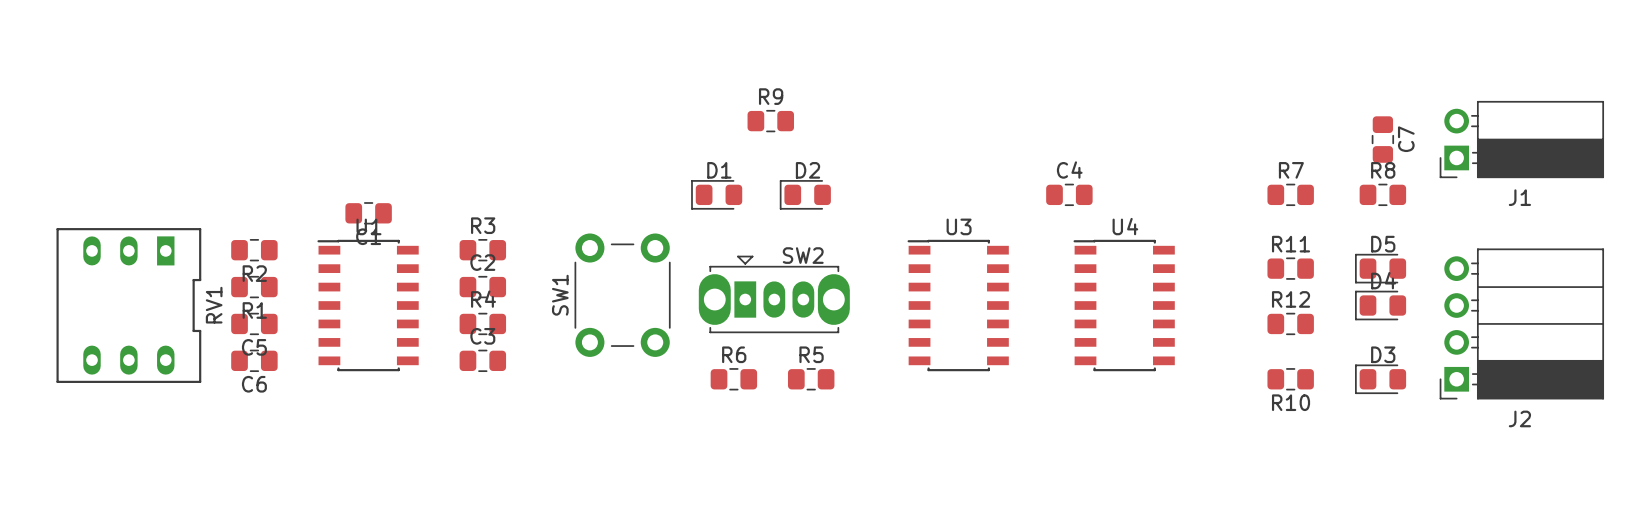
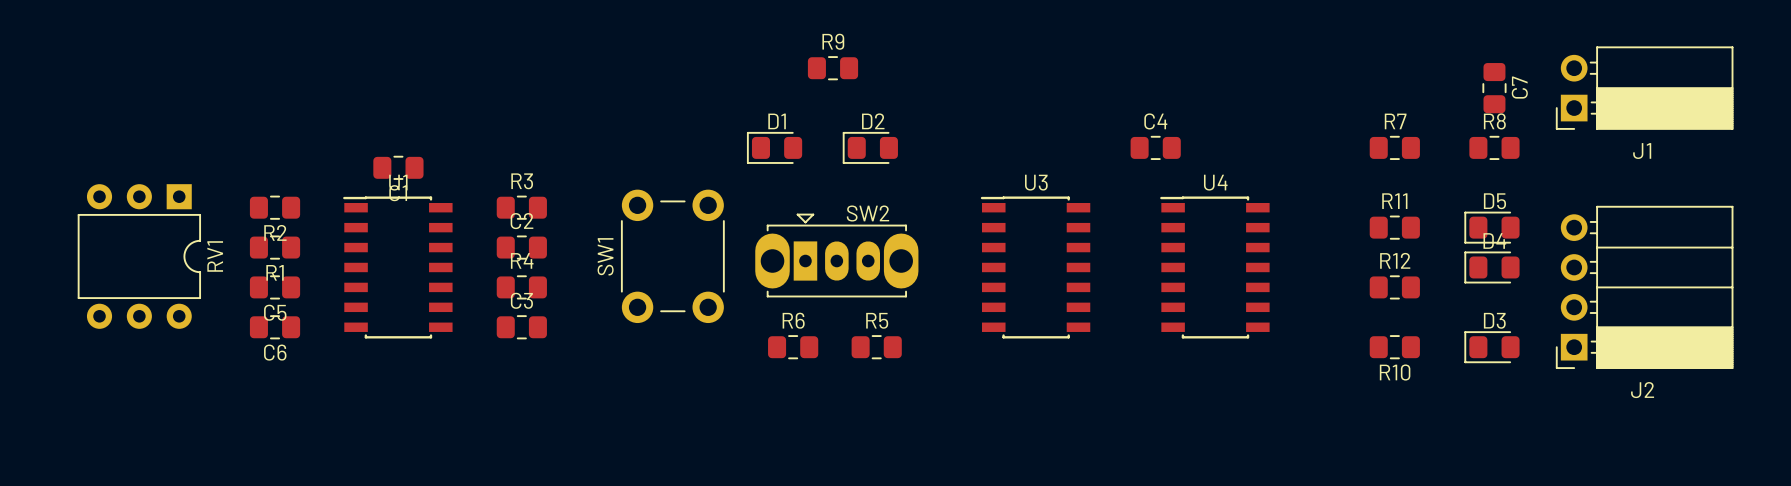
RV1 footprint: [56, 228, 202, 383] -> [77, 184, 202, 329]

